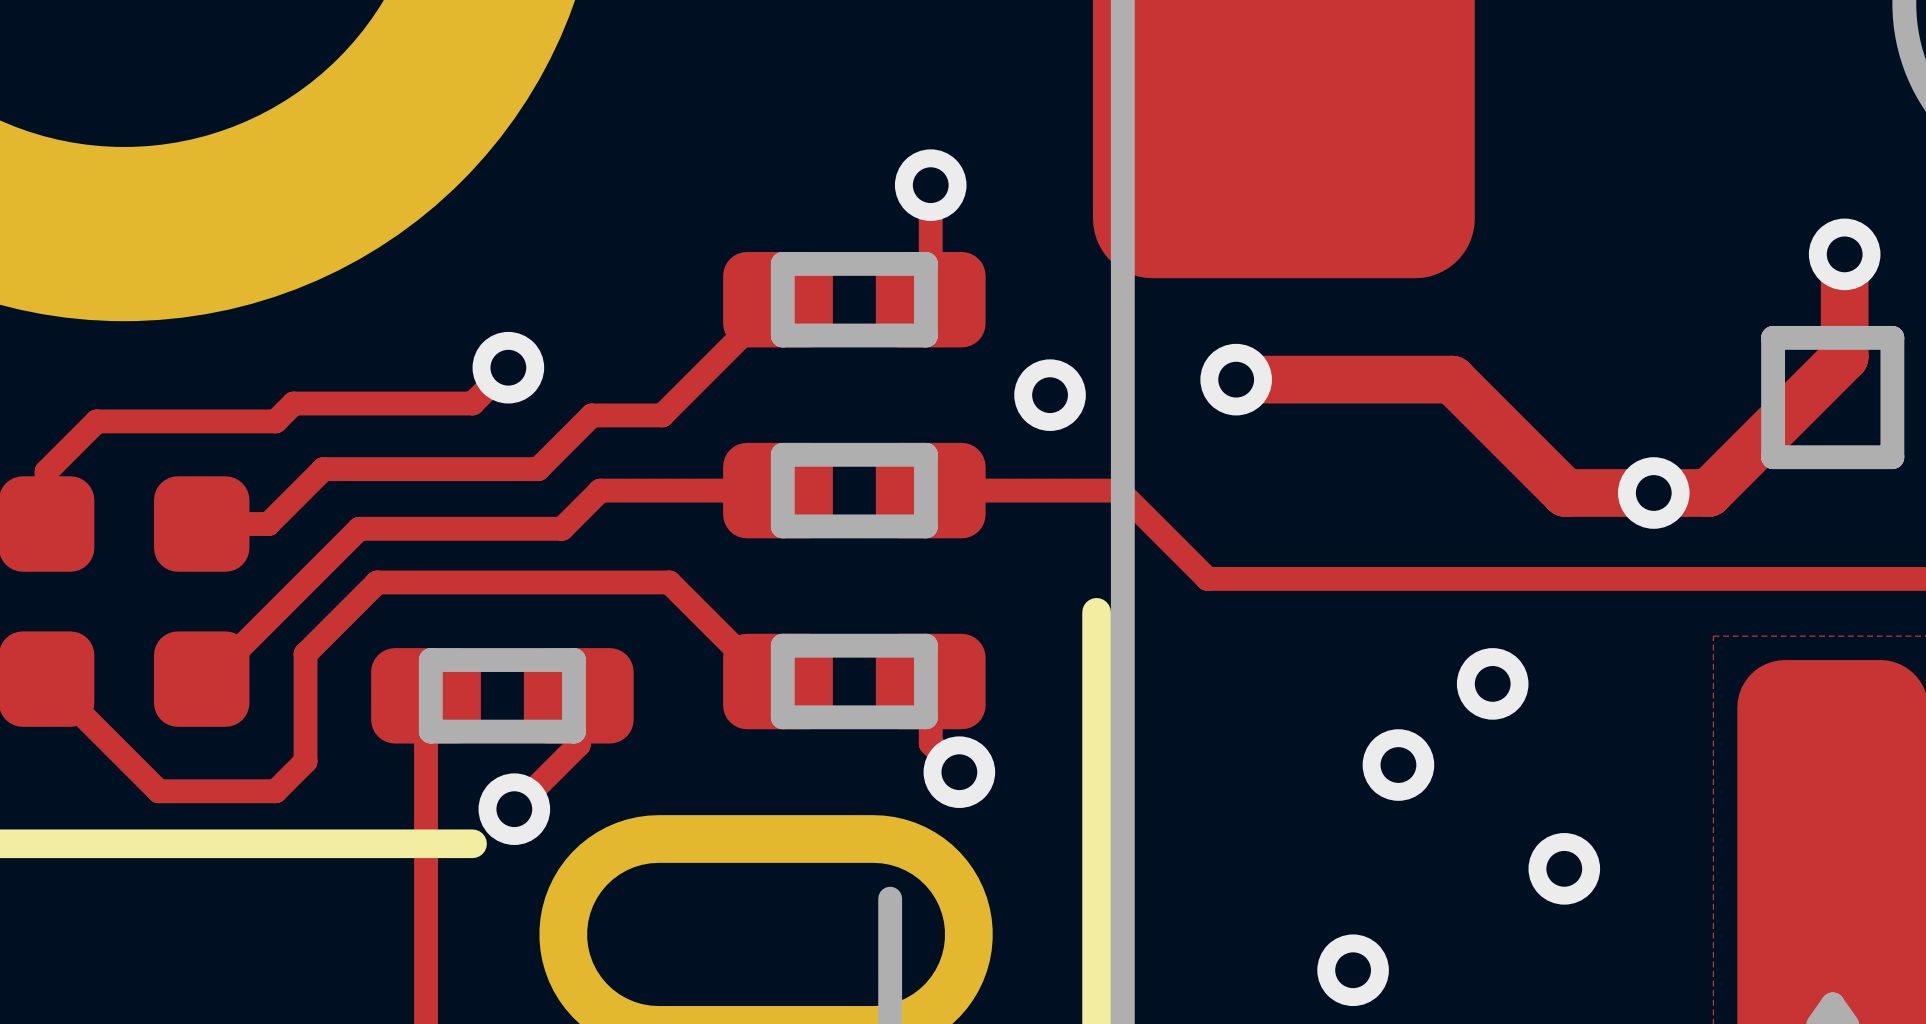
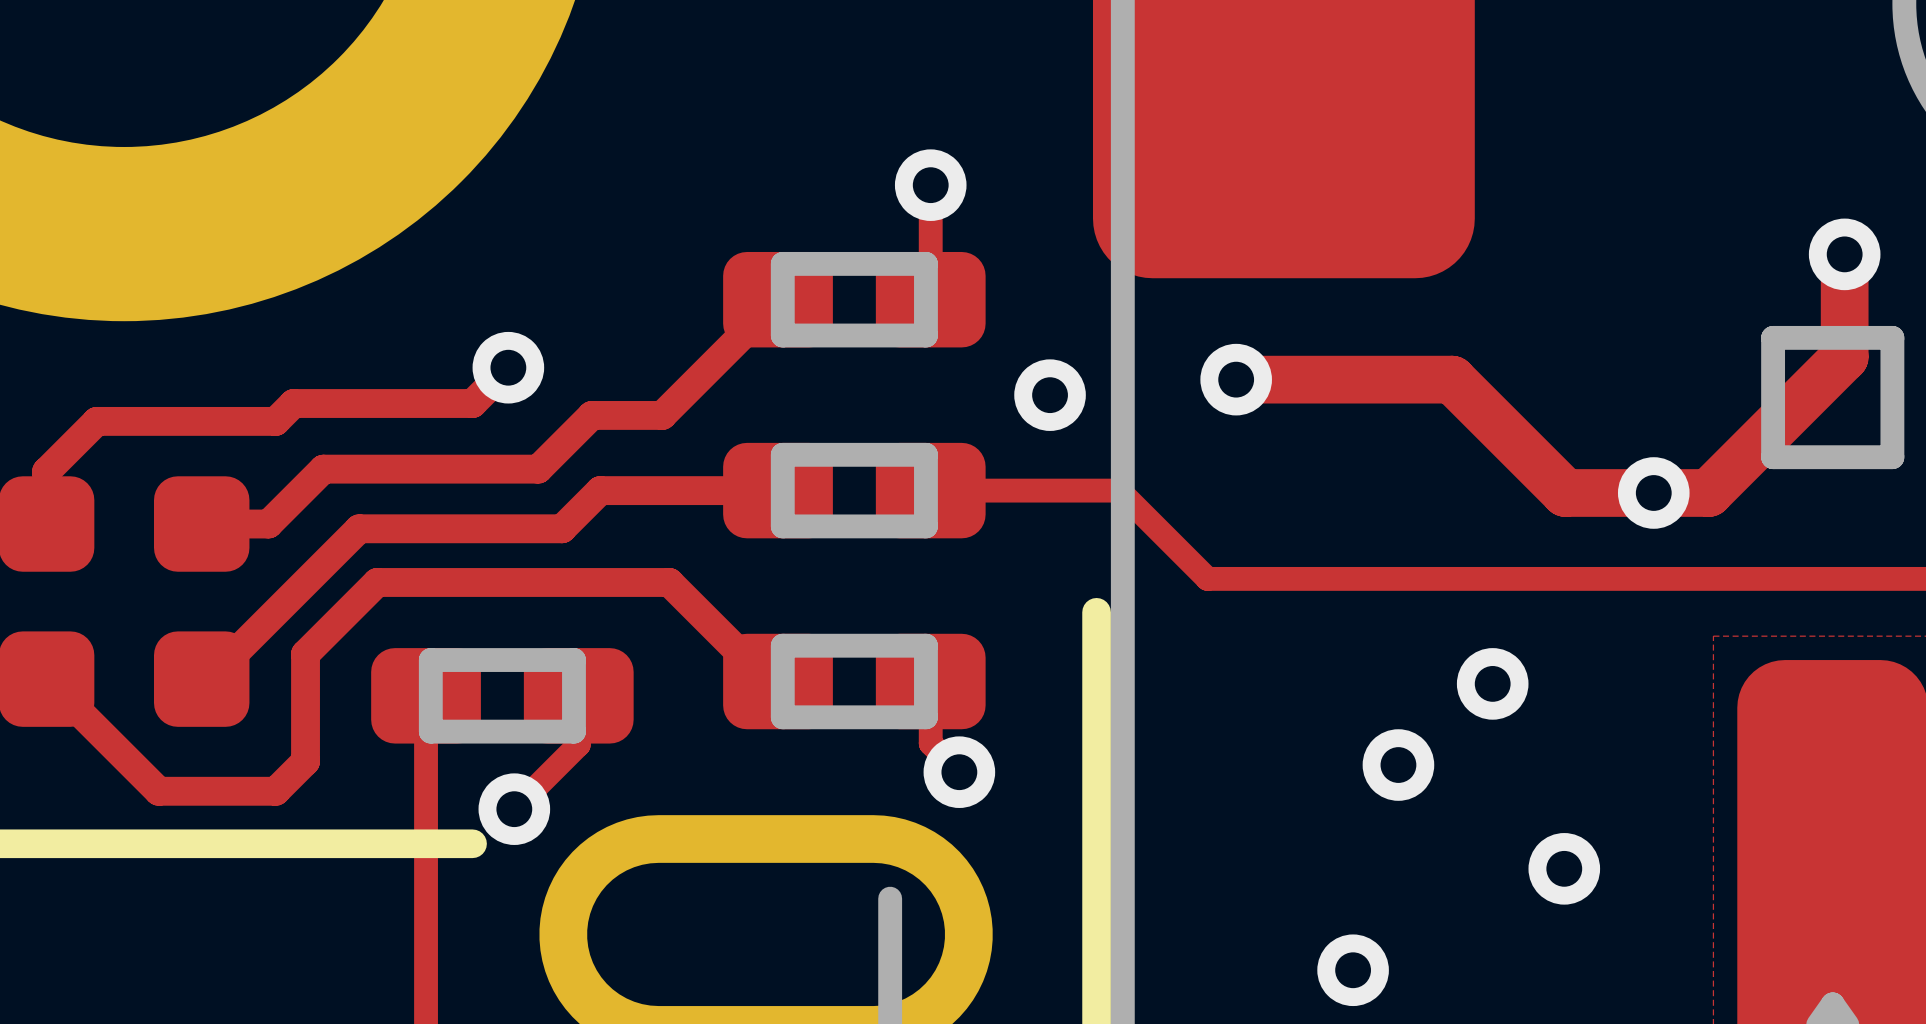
track width: thin (778, 299) (662, 415) (591, 415) (538, 469) (323, 469) (268, 524) (201, 524) -> thick (778, 299) (662, 415) (591, 415) (538, 469) (323, 469) (268, 524) (201, 524)
track width: thin (508, 367) (472, 403) (293, 403) (275, 421) (96, 421) (46, 471) (46, 524) -> thick (508, 367) (472, 403) (293, 403) (275, 421) (96, 421) (46, 471) (46, 524)
track width: thin (778, 490) (600, 490) (562, 528) (359, 528) (208, 679) (201, 679) -> thick (778, 490) (600, 490) (562, 528) (359, 528) (208, 679) (201, 679)
track width: thin (46, 679) (158, 791) (275, 791) (305, 761) (305, 654) (377, 582) (669, 582) (768, 681) (778, 681) -> thick (46, 679) (158, 791) (275, 791) (305, 761) (305, 654) (377, 582) (669, 582) (768, 681) (778, 681)

